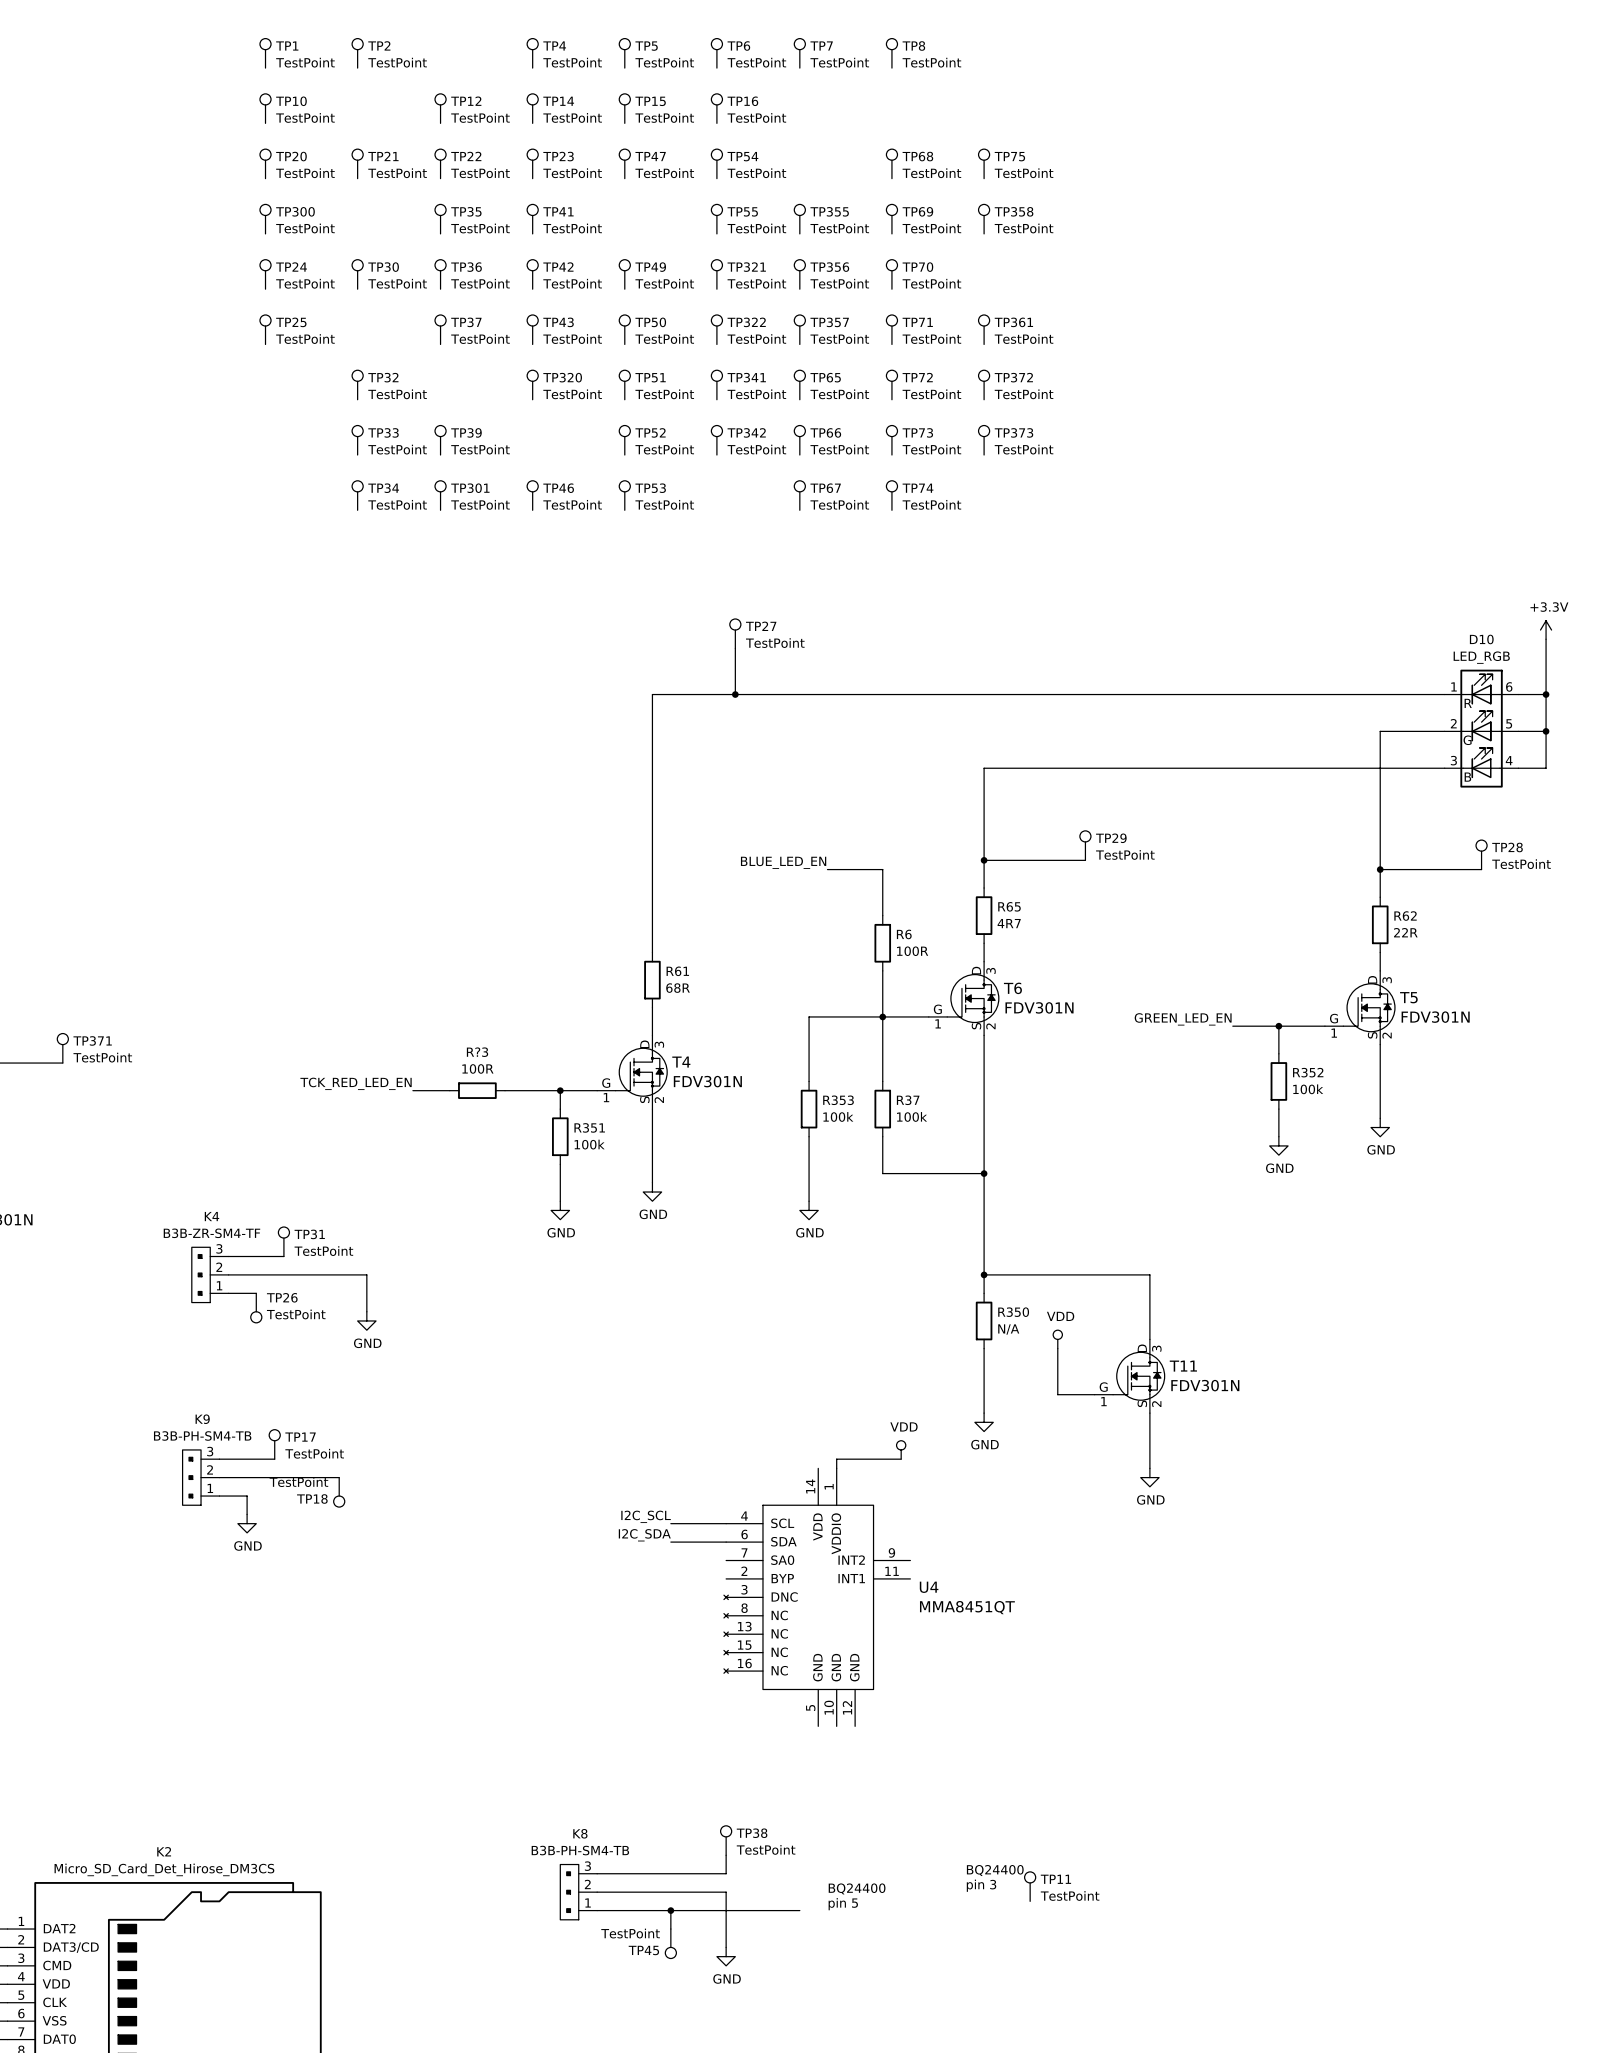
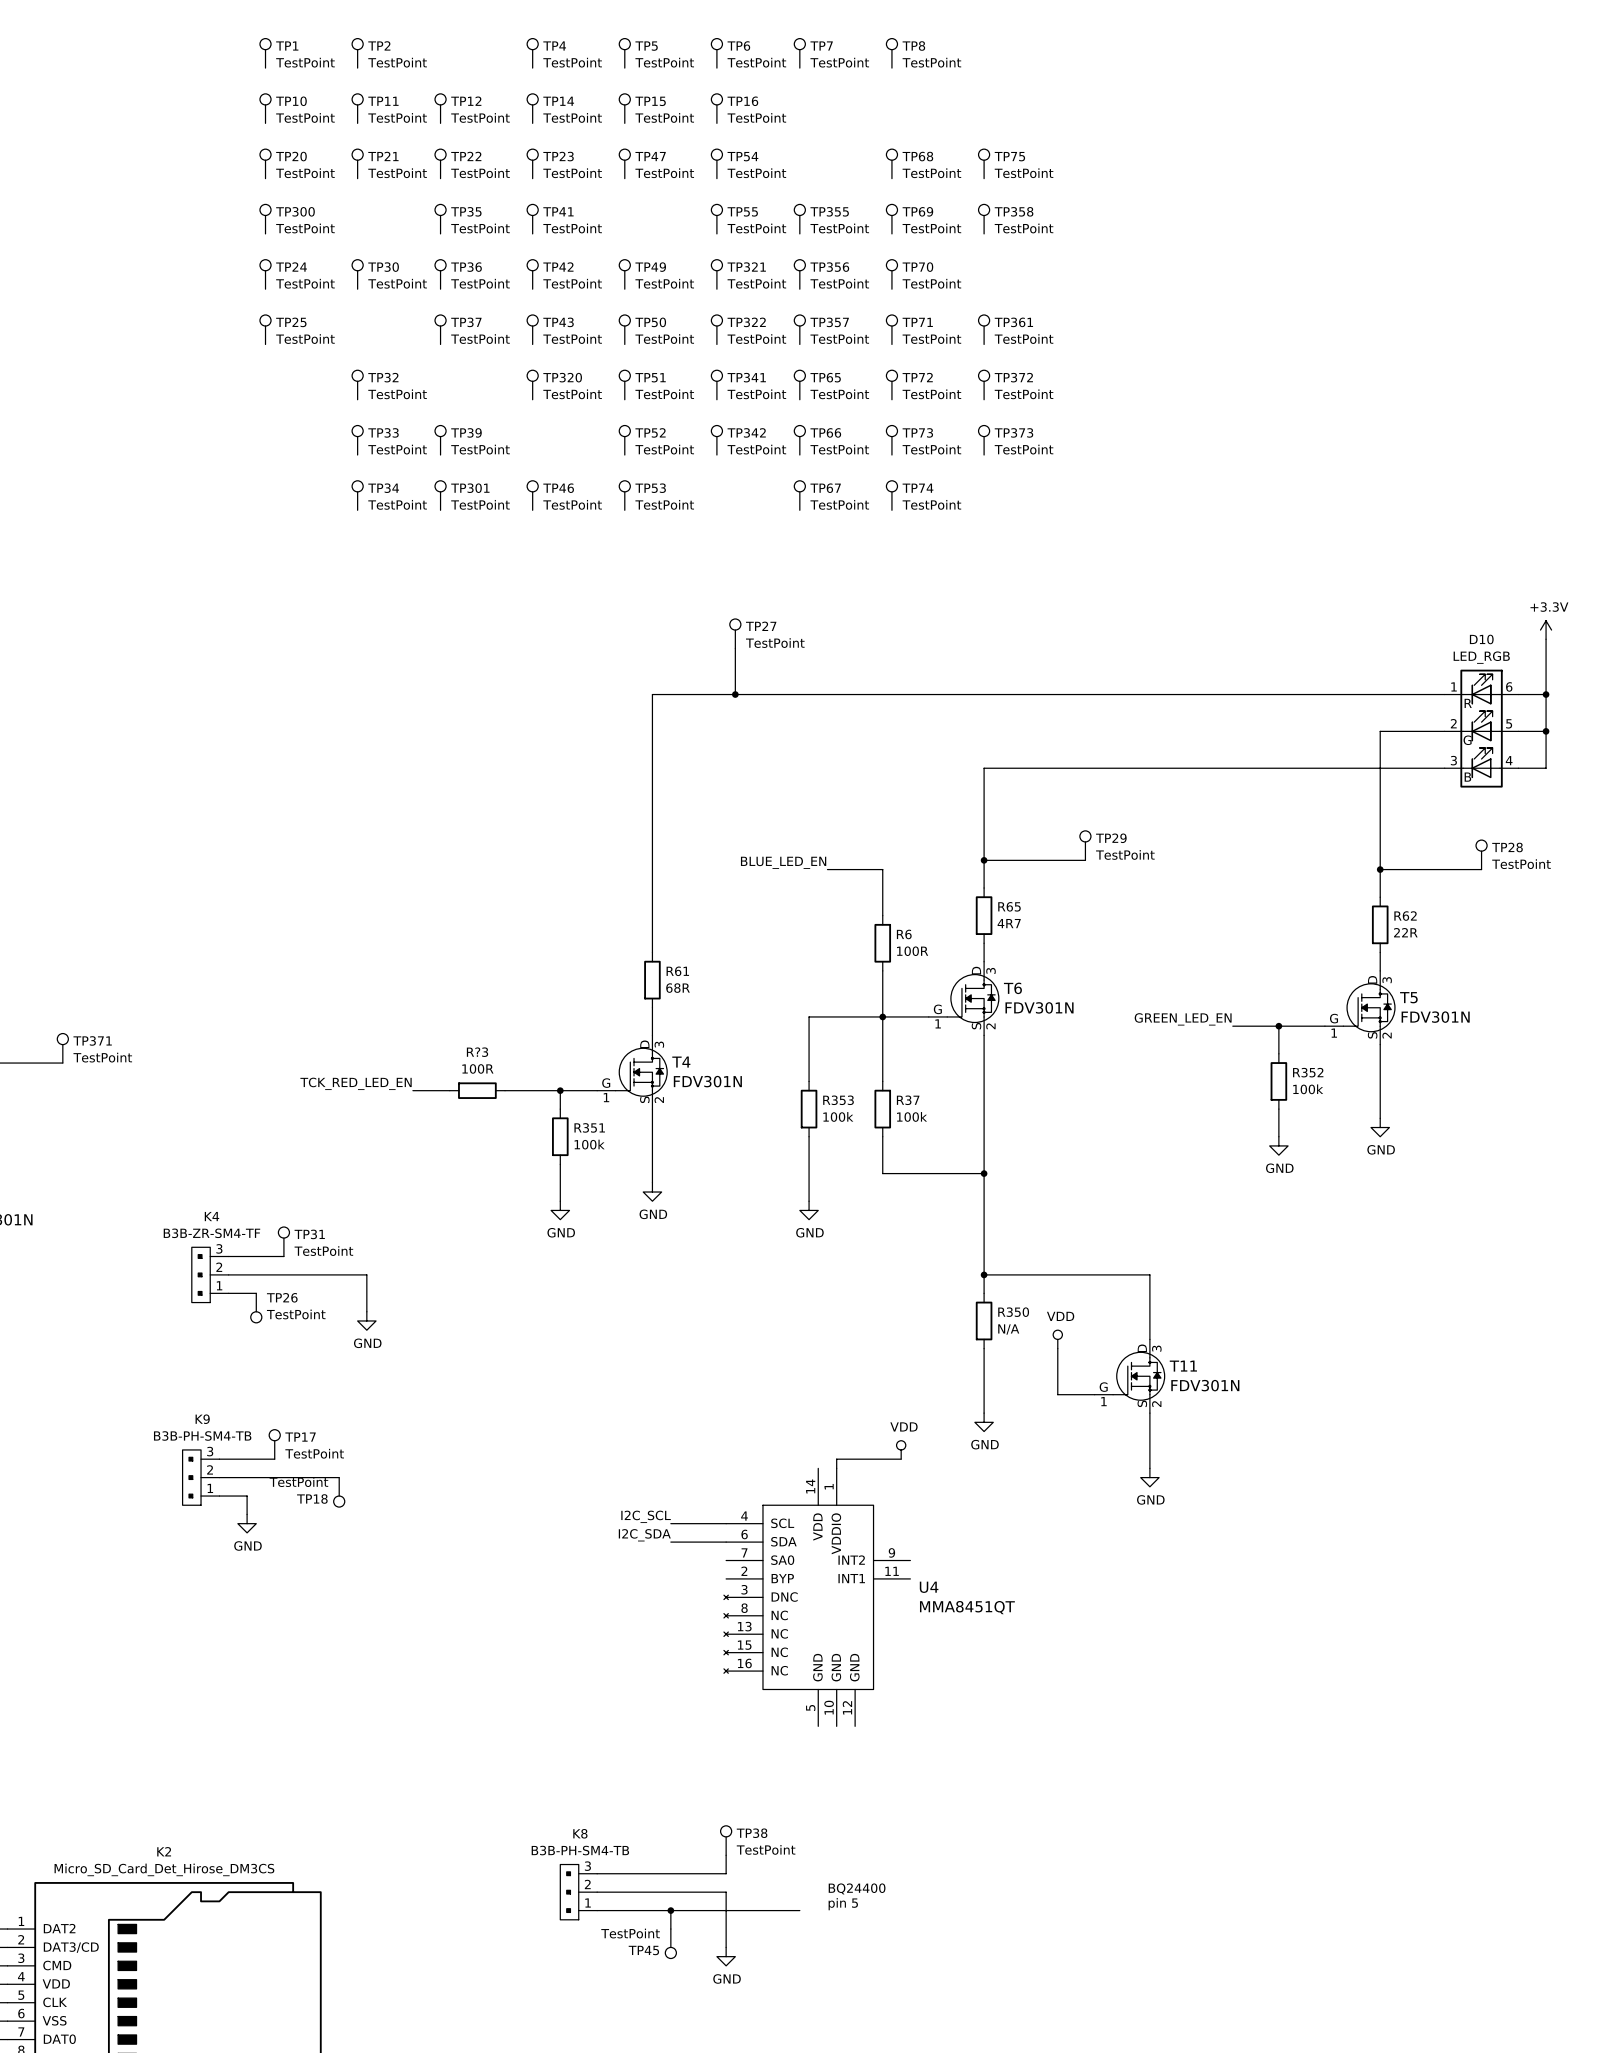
text: BQ24400 (995, 1870) -> none
text: pin 3 (981, 1885) -> none
TP11 position: (1030, 1886) -> (357, 108)

